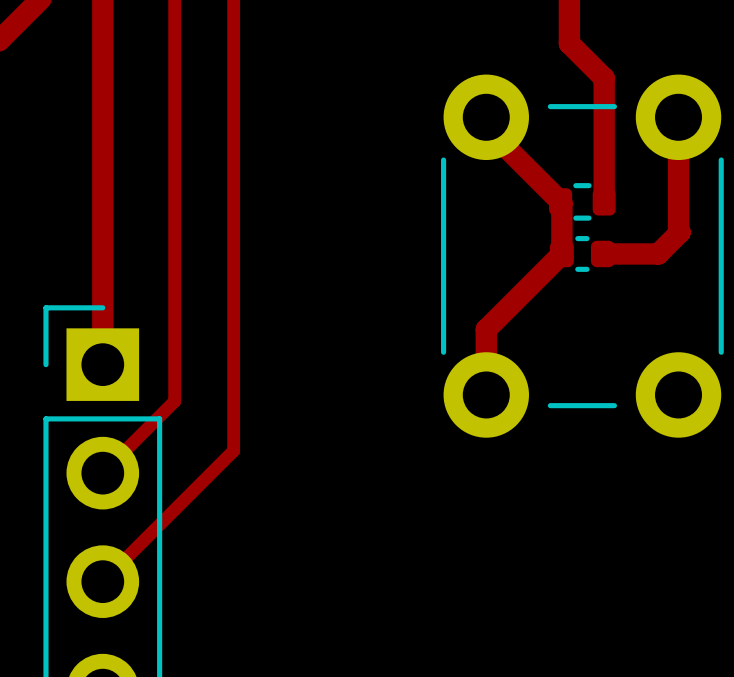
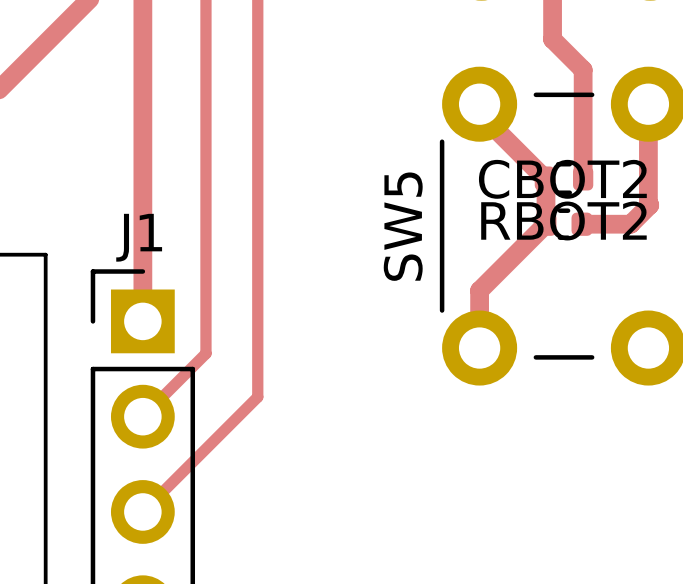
CBOT2 name: none -> CBOT2 (562, 179)
RBOT2 name: none -> RBOT2 (563, 220)
SW5 name: none -> SW5 (403, 226)
J1 name: none -> J1 (139, 237)

